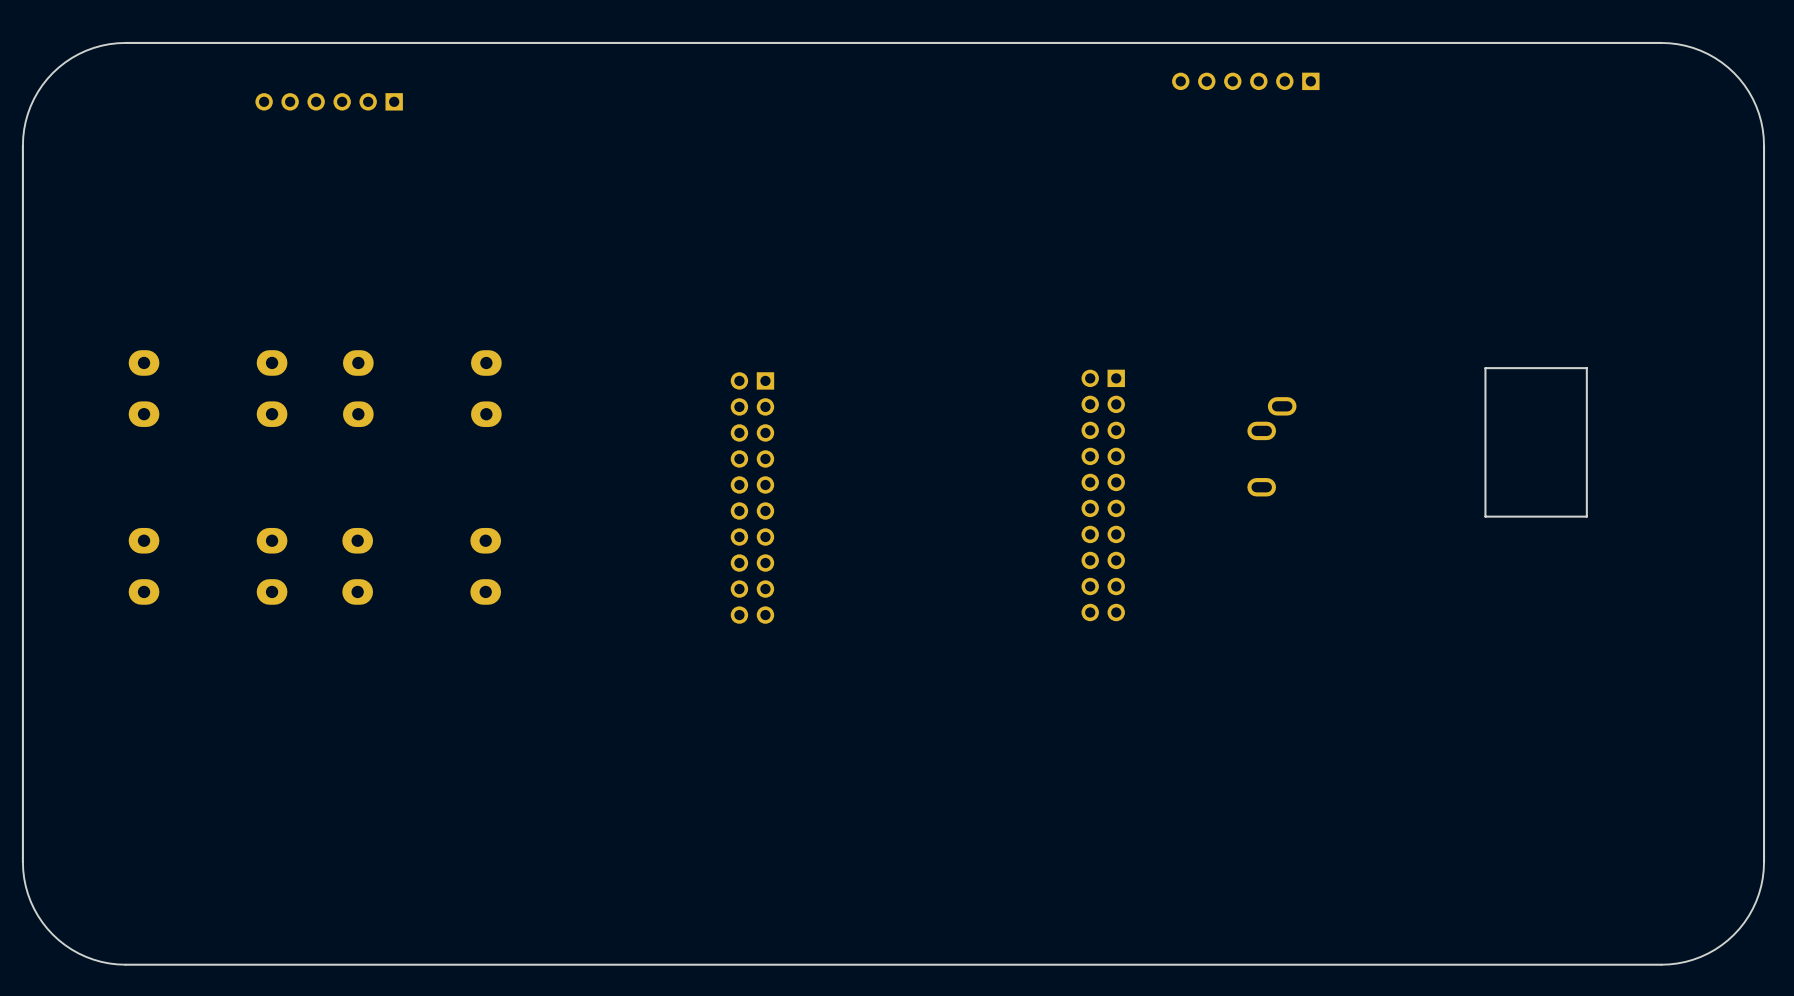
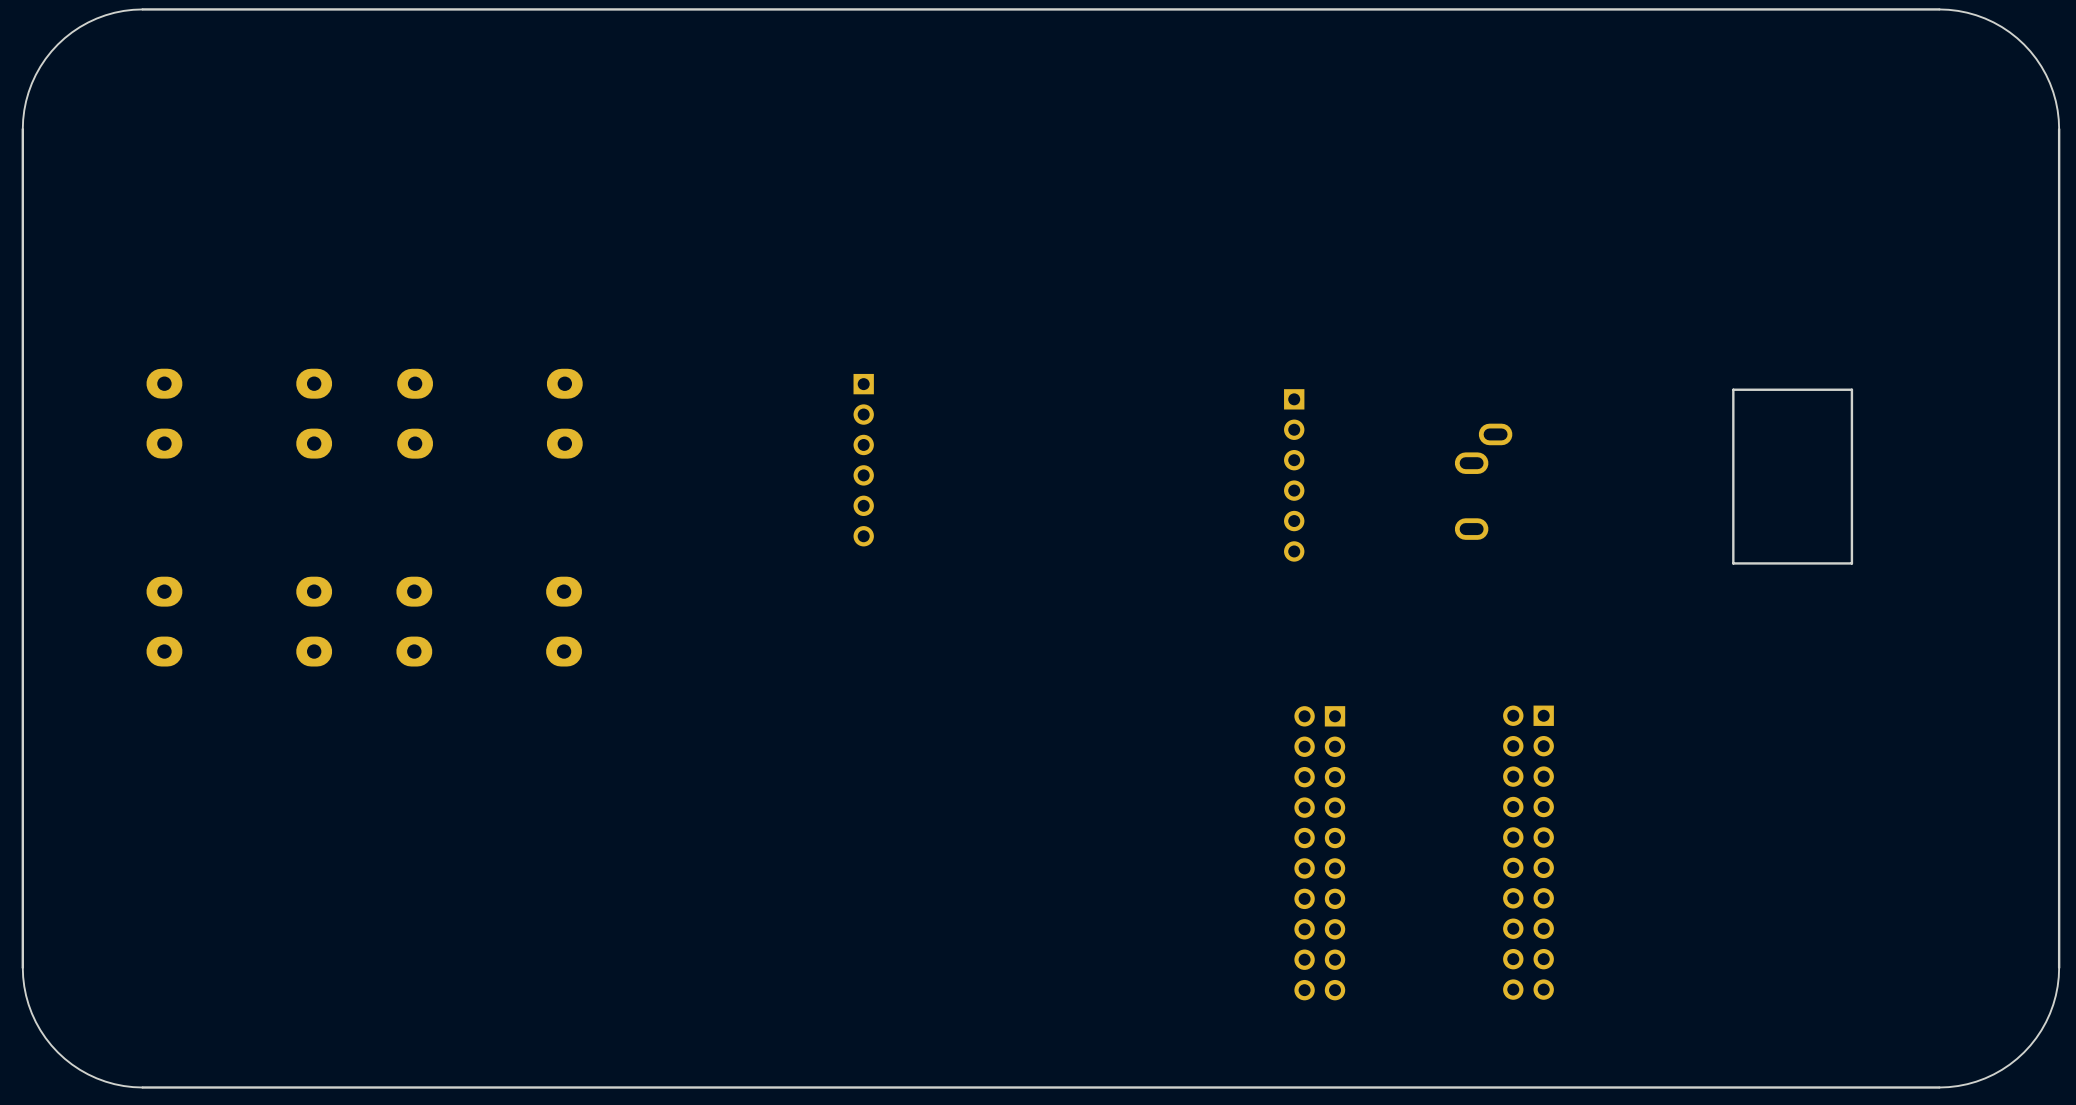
part: (1245, 81) -> none
part: (329, 101) -> none
part: none -> (863, 460)
part: none -> (1294, 475)
part: (1103, 495) -> none
part: (752, 497) -> none
part: none -> (1528, 852)
part: none -> (1319, 853)

